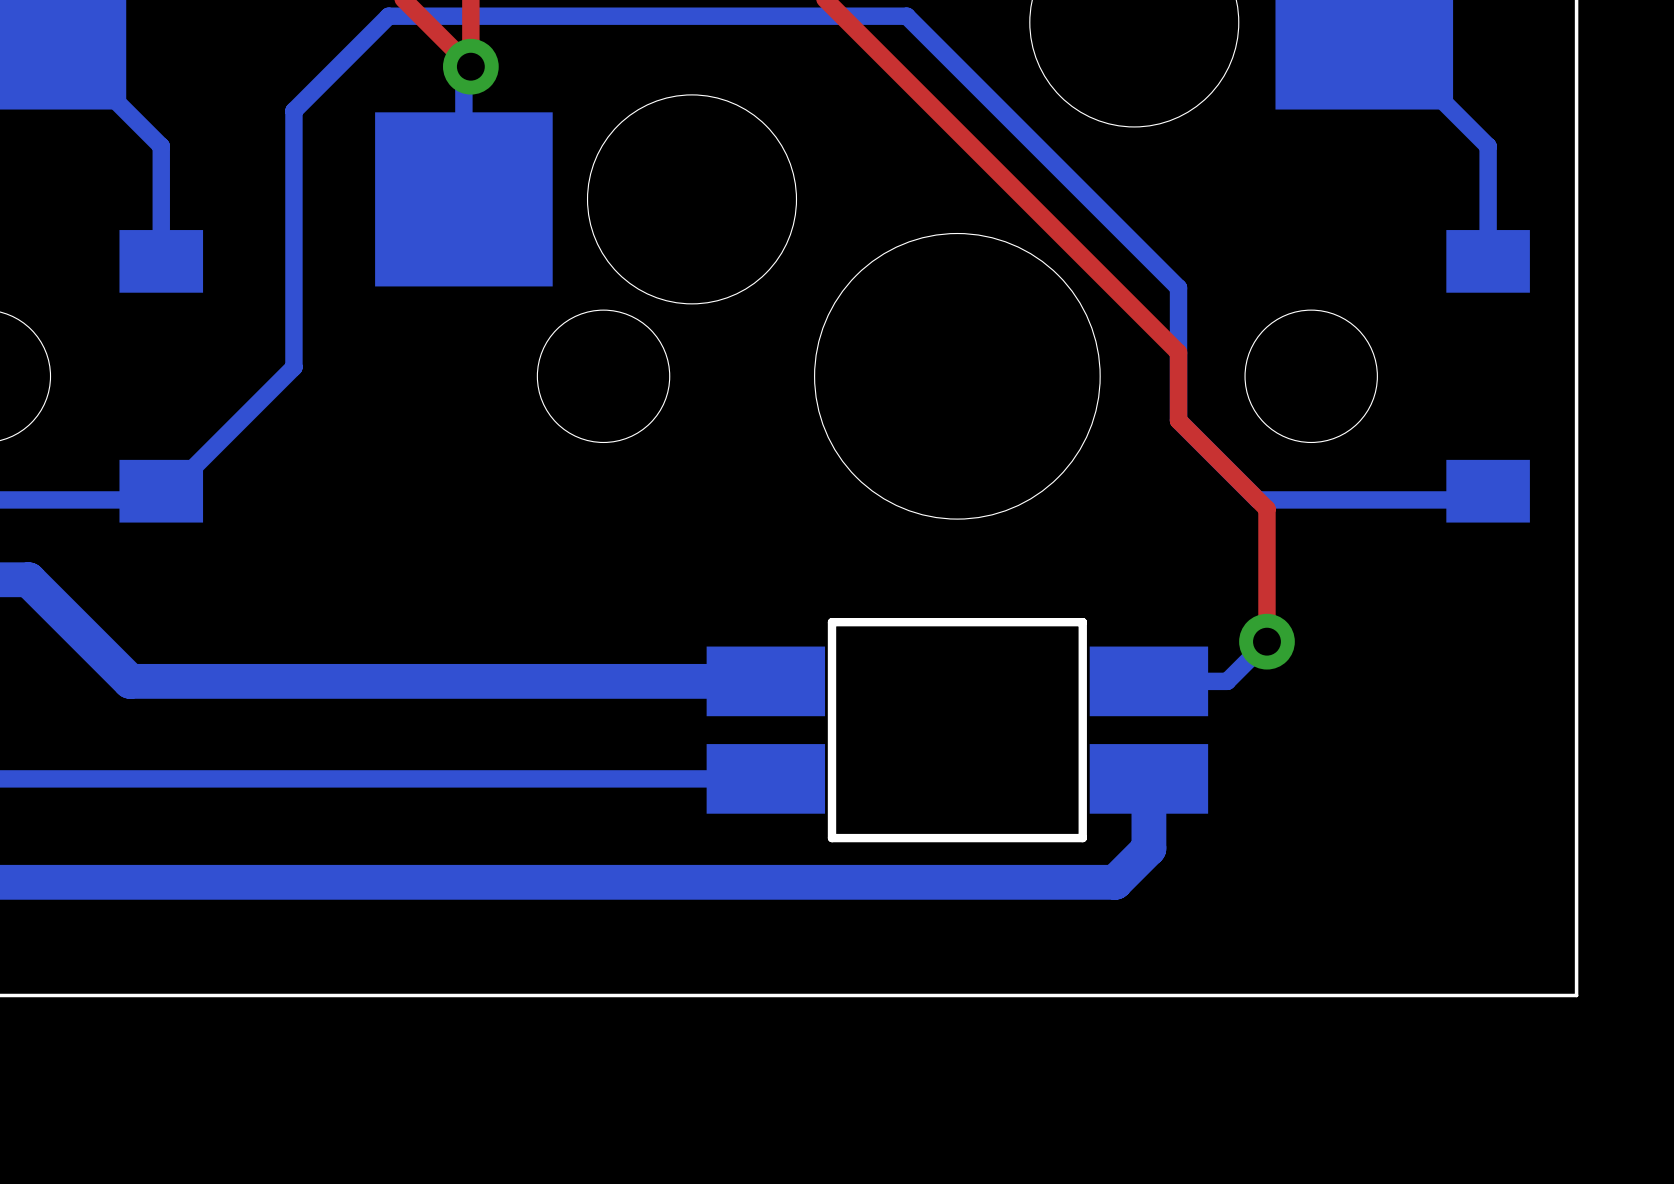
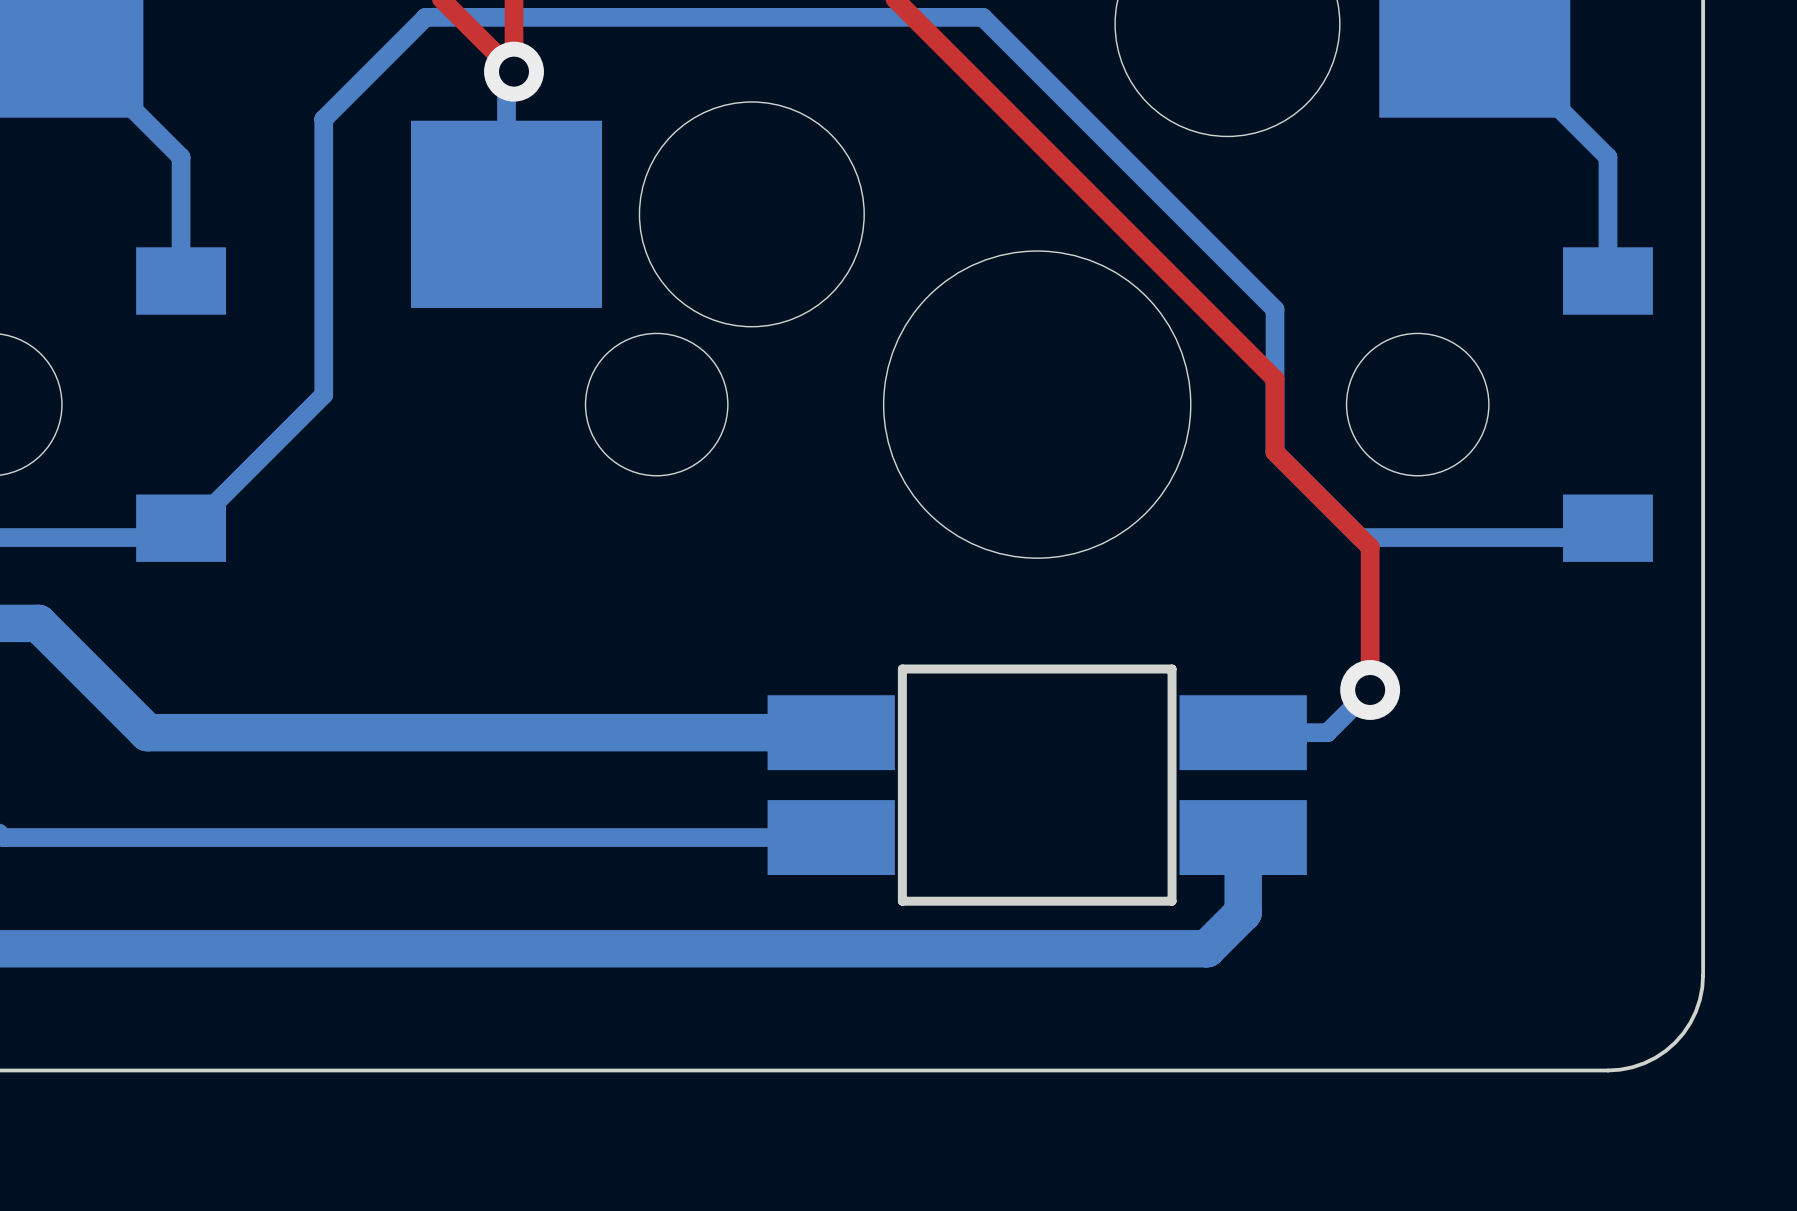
board edge: (1576, 907) (1576, 995) (1488, 995) -> (1703, 975) (1702, 987) (1695, 1011) (1683, 1033) (1675, 1042) (1665, 1050) (1644, 1063) (1620, 1069) (1607, 1070)

